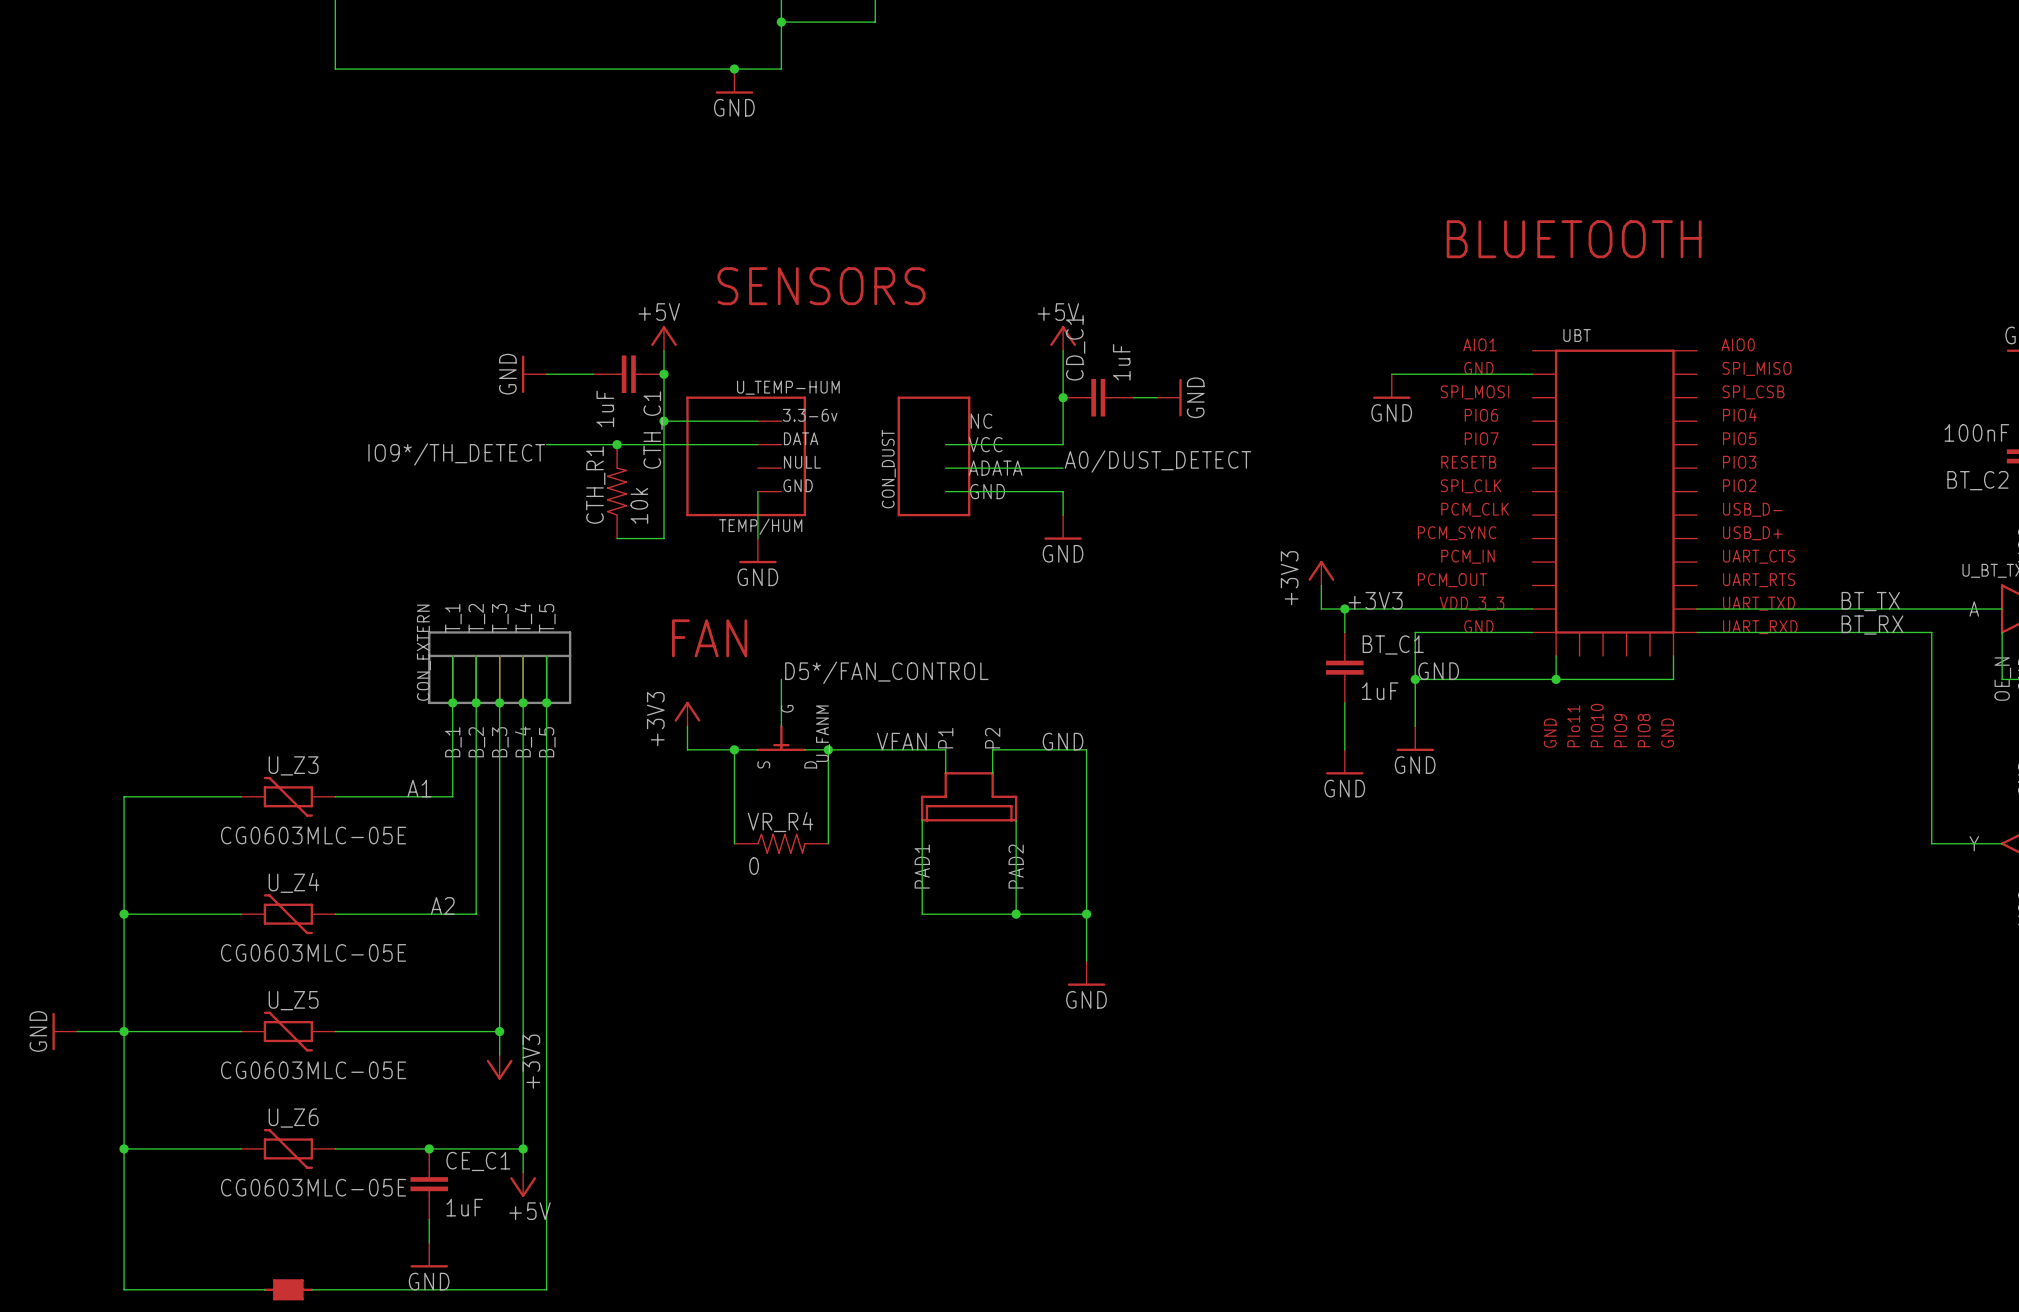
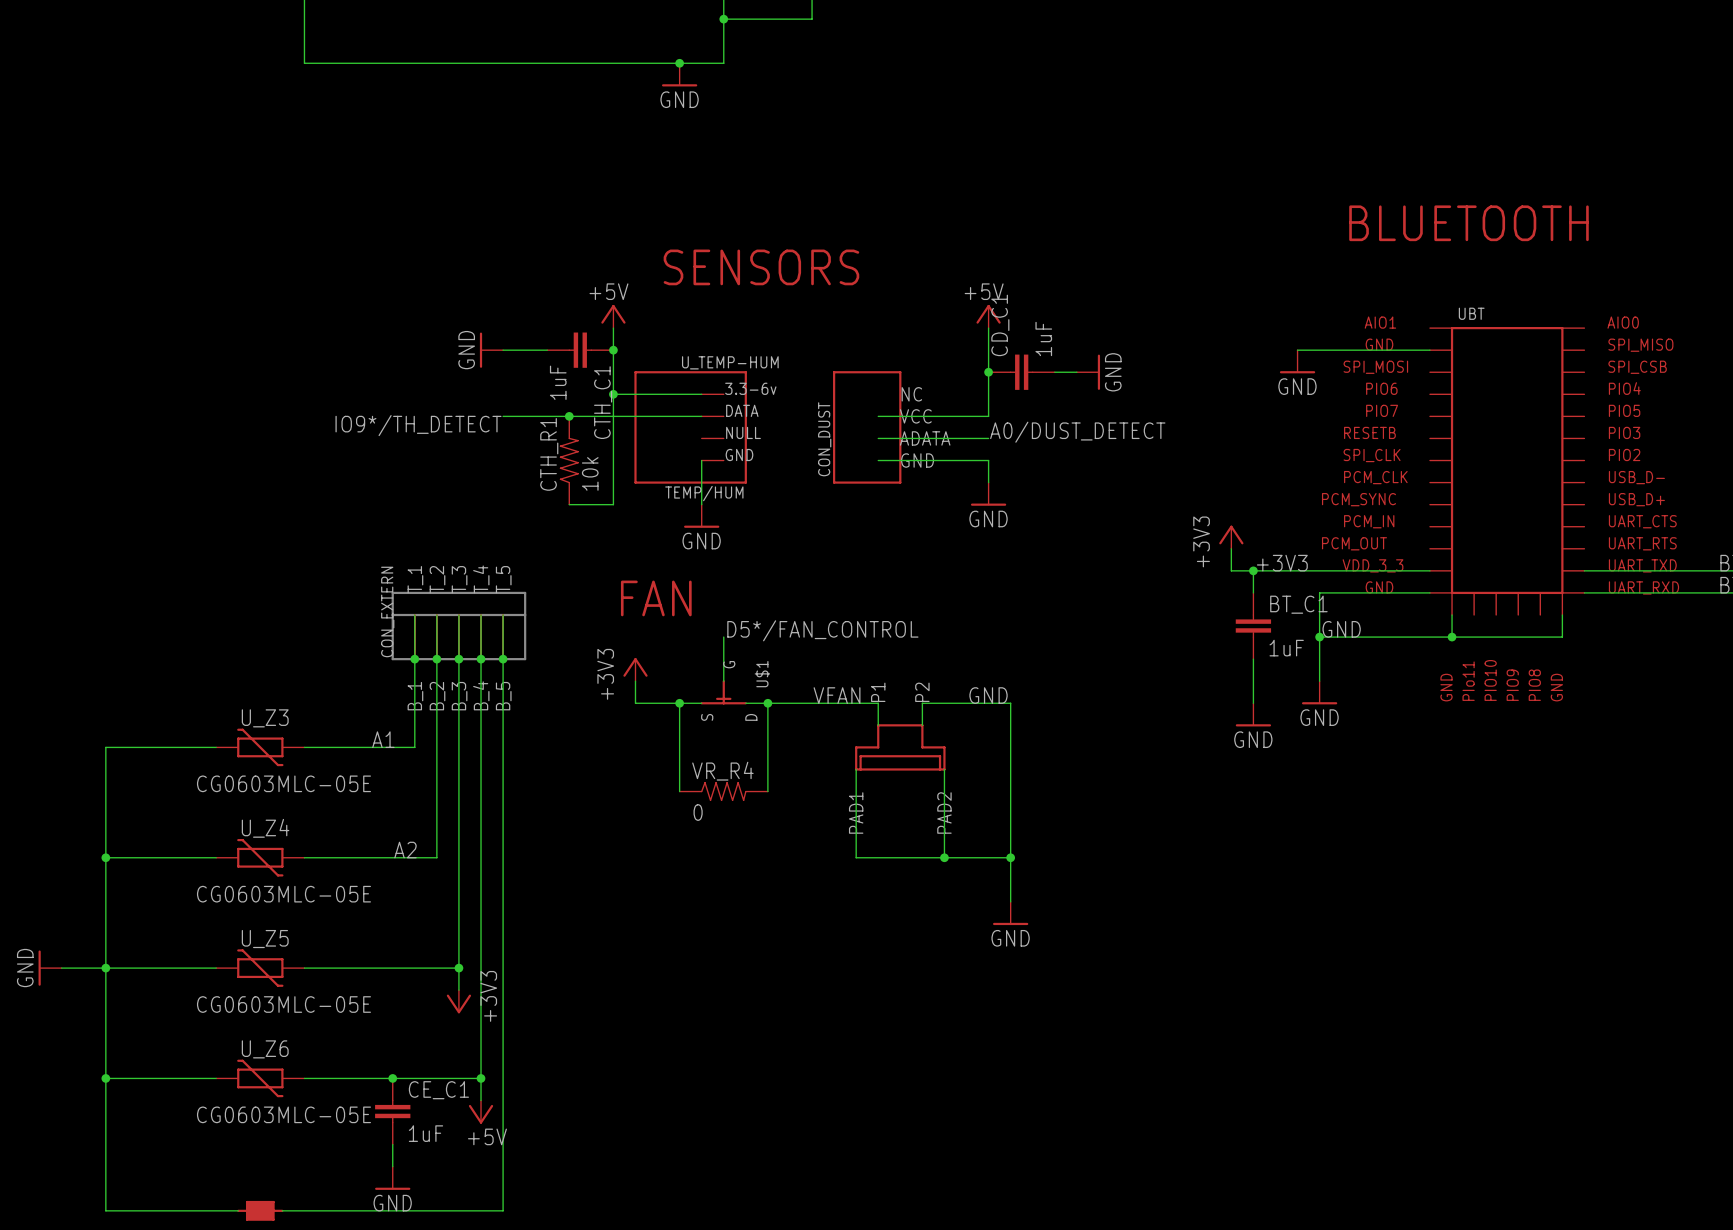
U_FANM name: U_FANM (823, 733) -> U$1 (762, 674)

